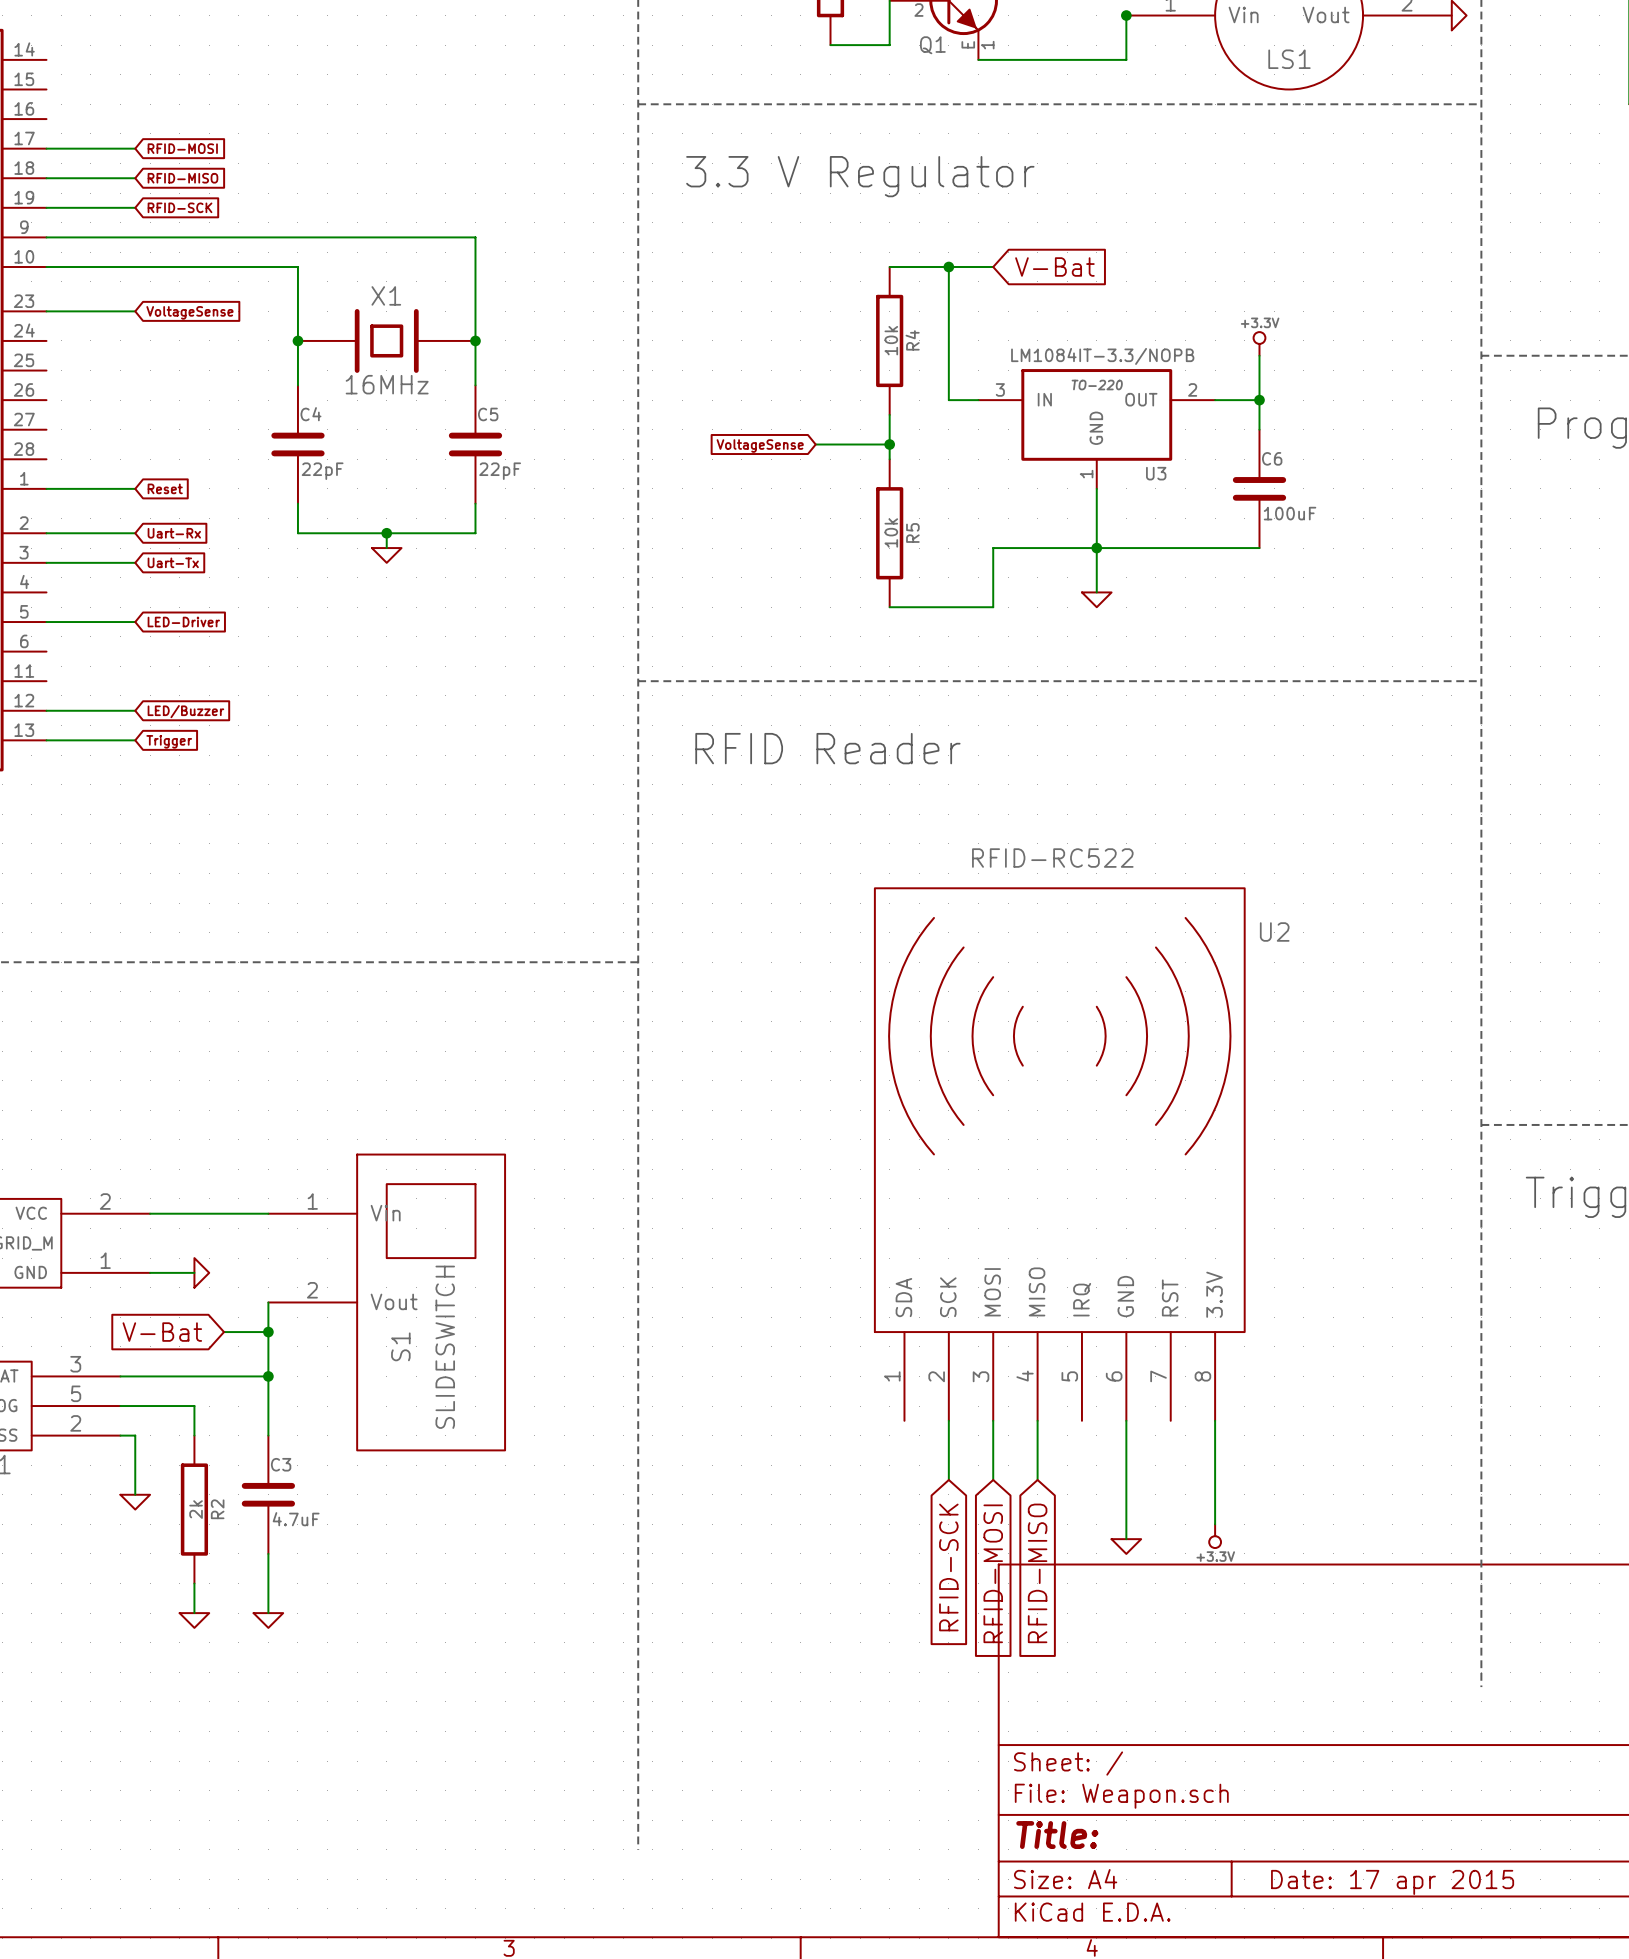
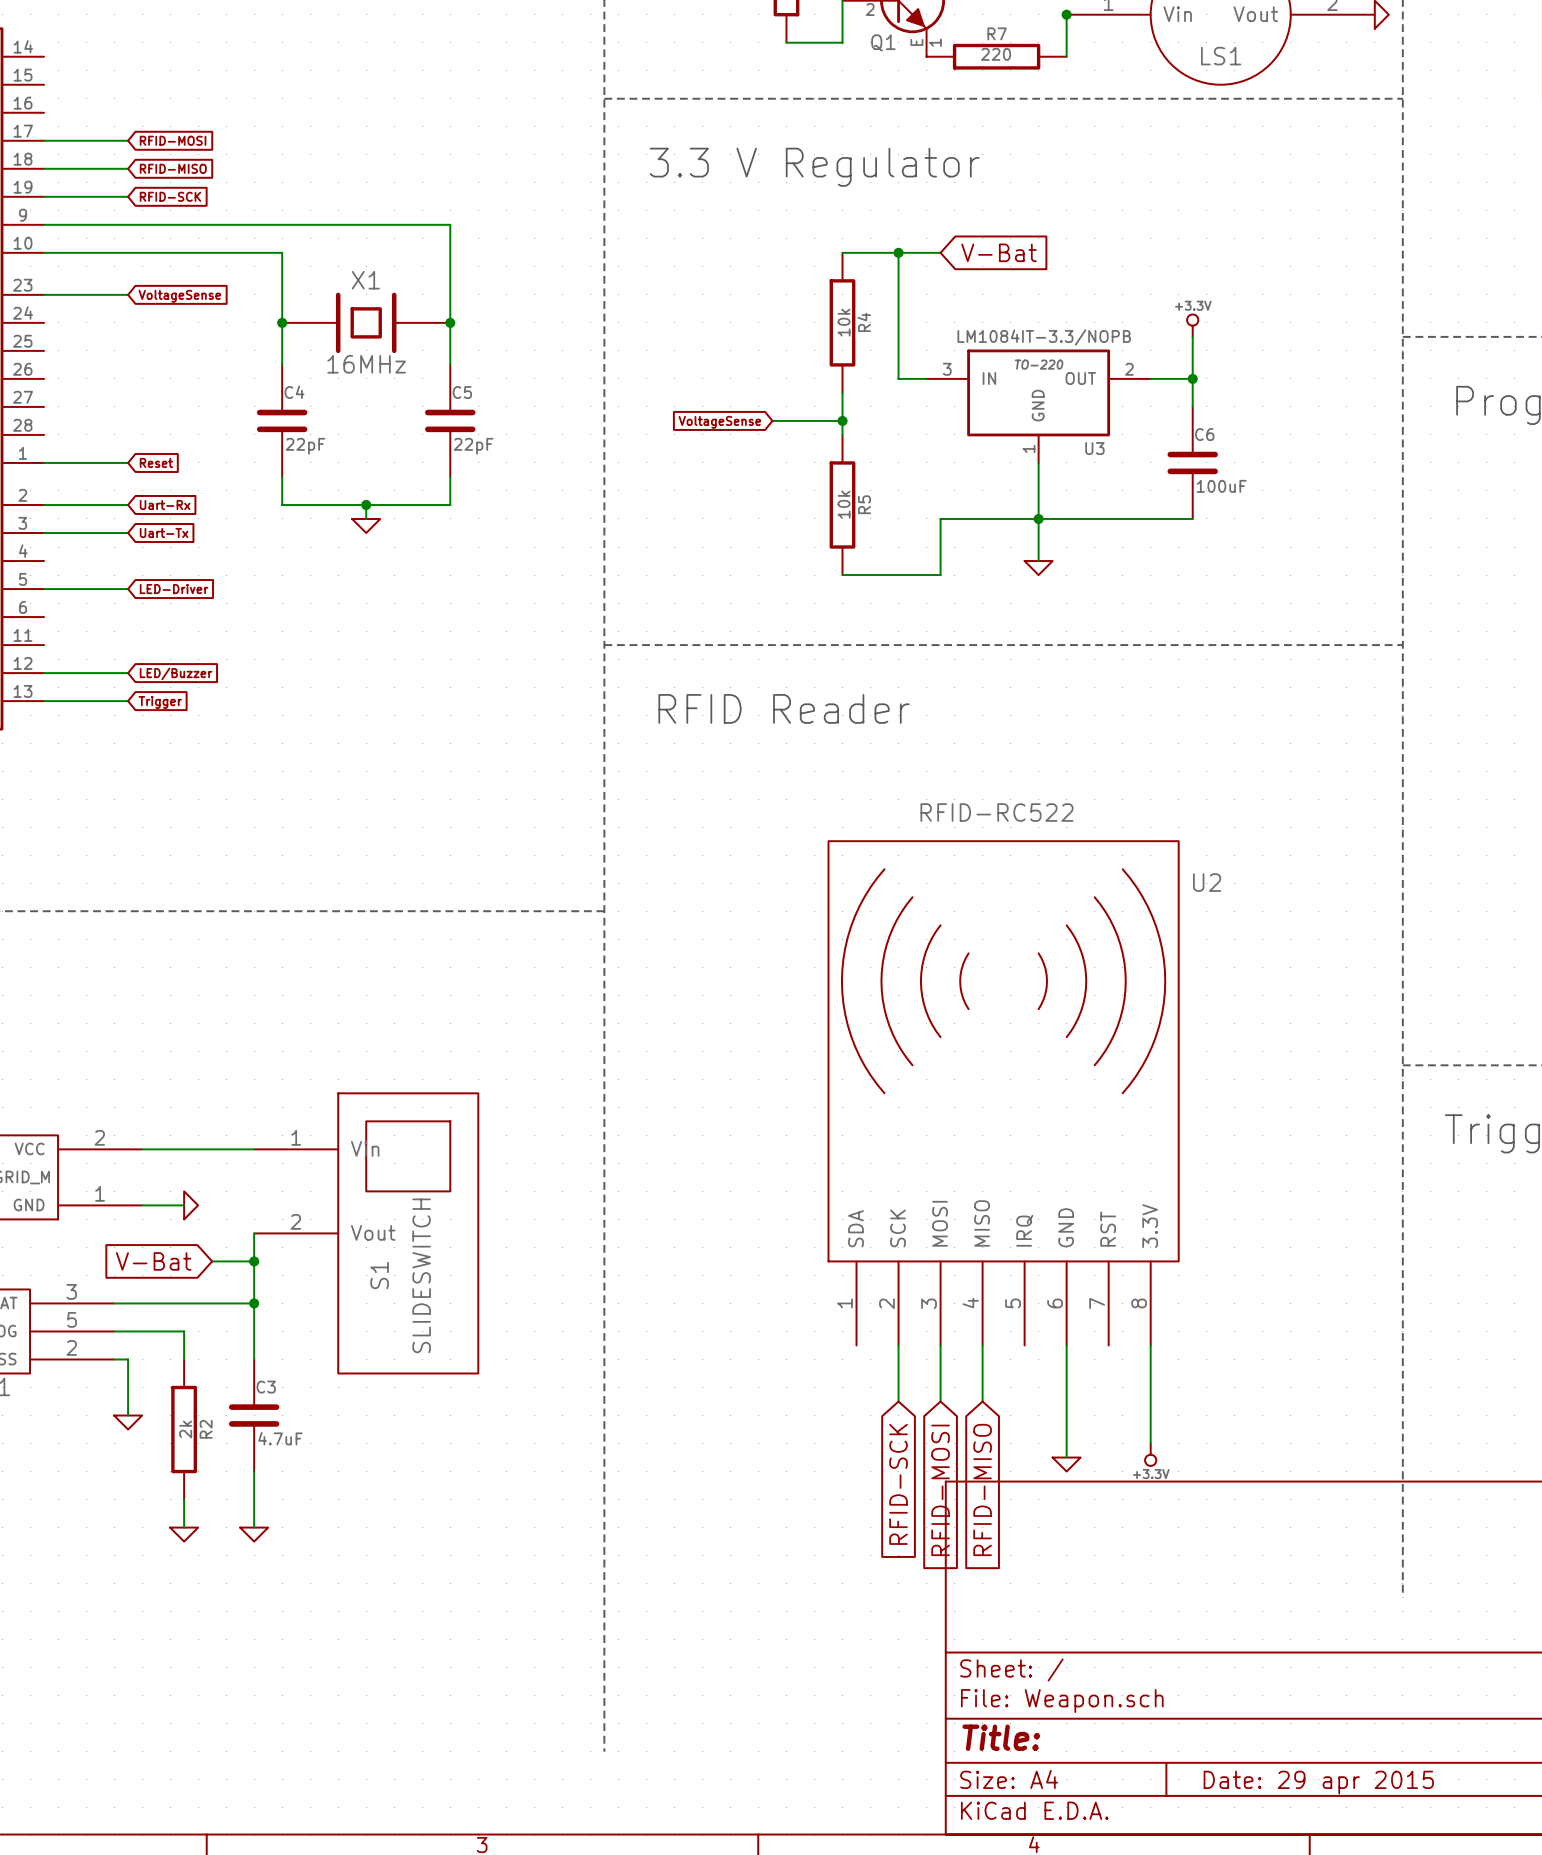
wire: (978, 59) (1126, 59) -> none
R7: none -> 220 (996, 56)
title block: Date: 17 apr 2015 (1392, 1882) -> Date: 29 apr 2015 (1318, 1782)

